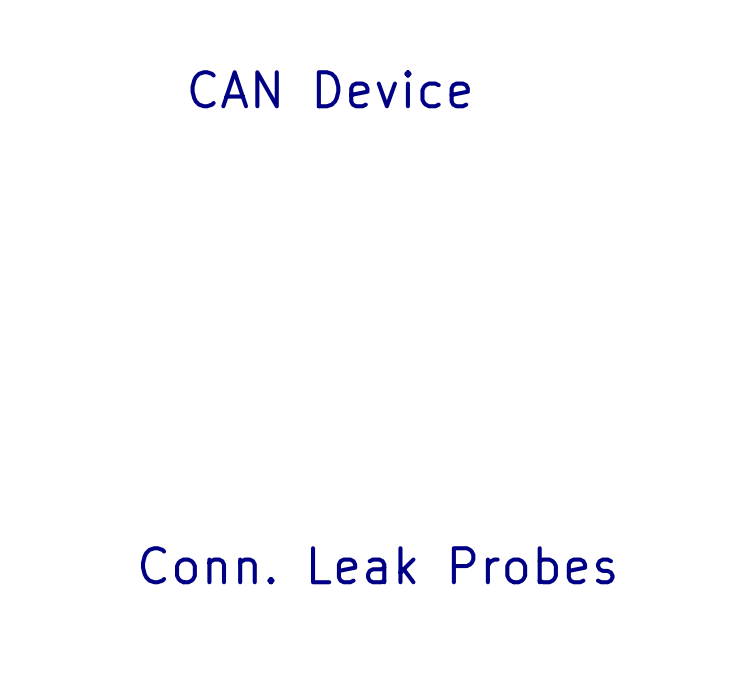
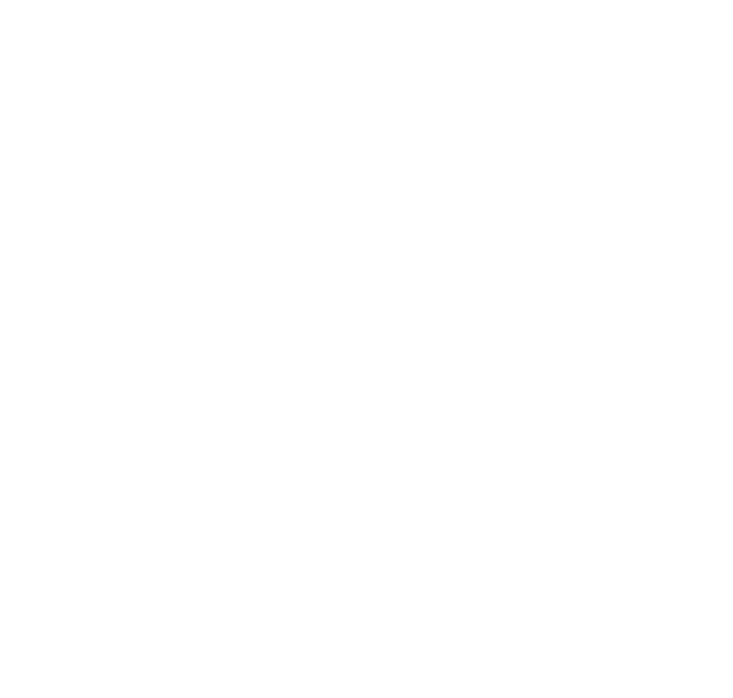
text: CAN Device (330, 89) -> none
text: Conn. Leak Probes (377, 565) -> none

